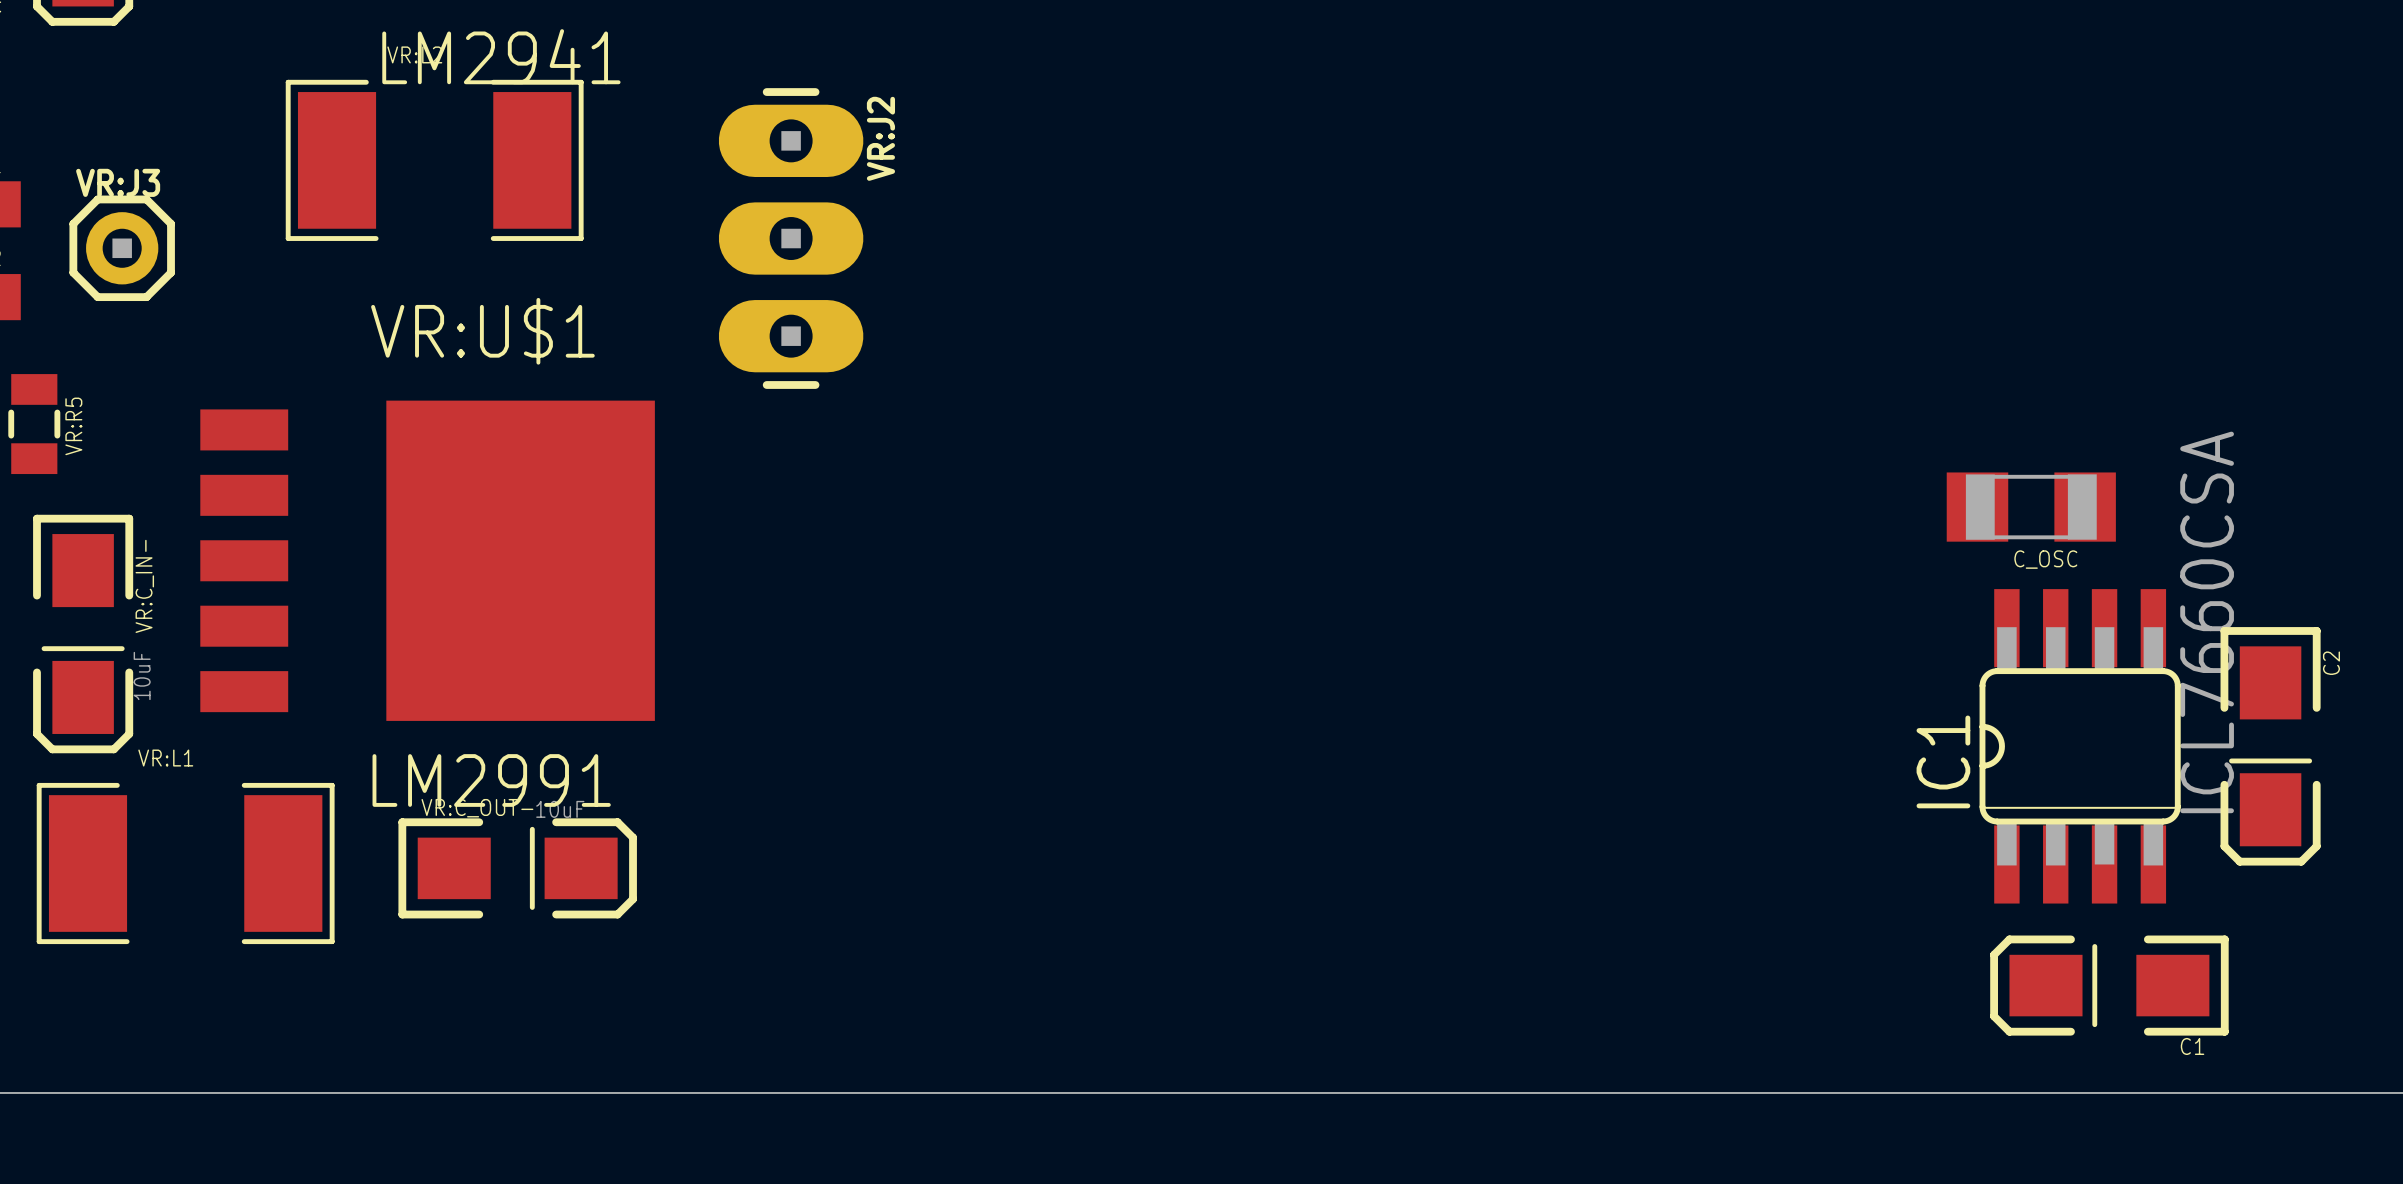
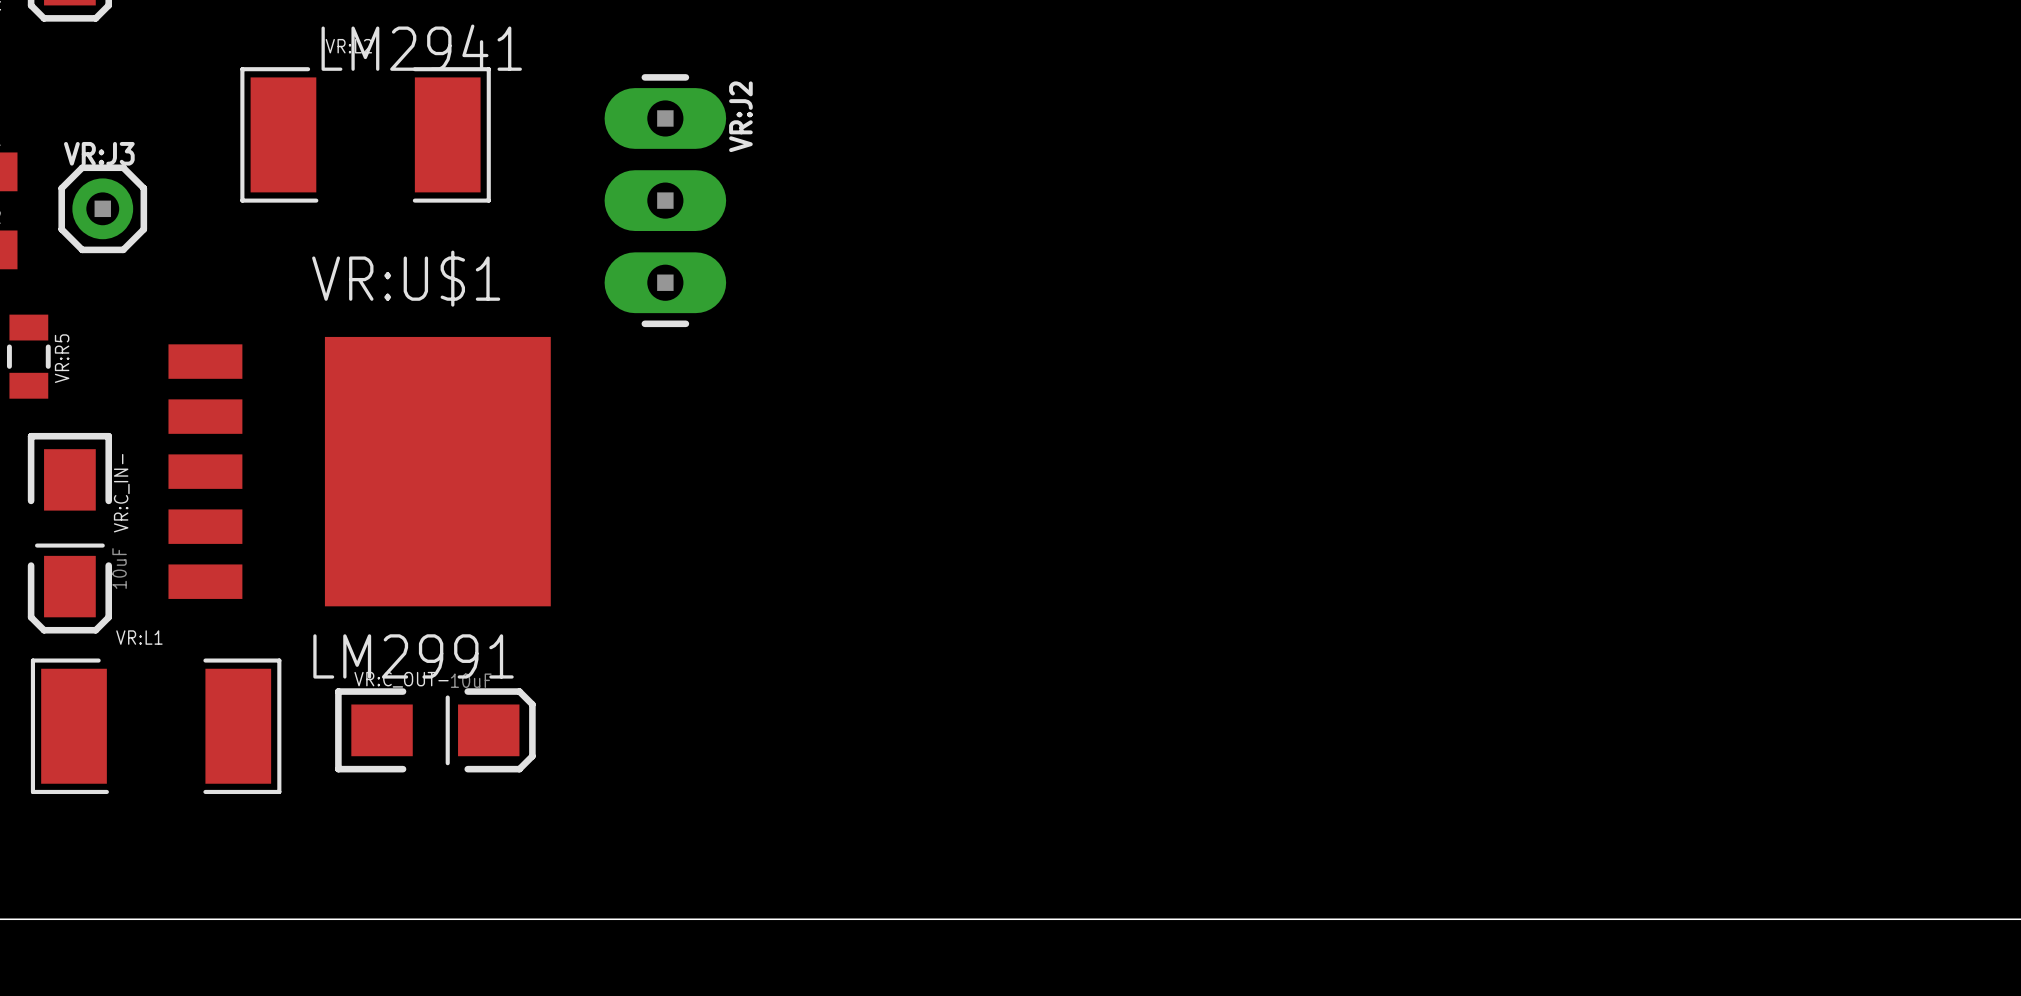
C_OSC: (2031, 507) -> none
IC1: ICL7660CSA (2080, 746) -> none
C2: (2270, 746) -> none
C1: (2109, 985) -> none

